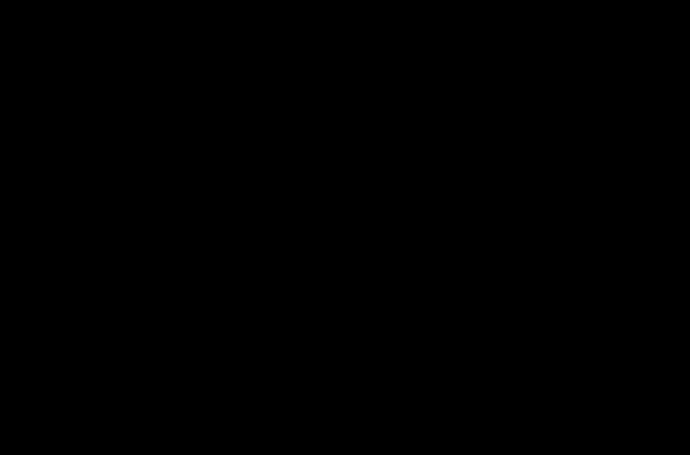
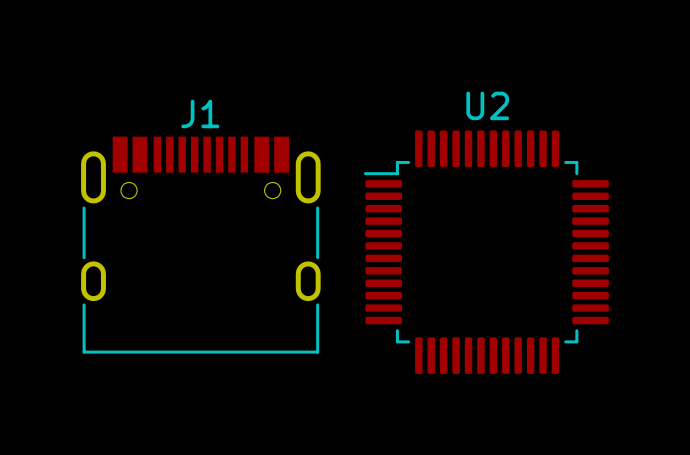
J1: none -> (200, 245)
U2: none -> (486, 252)

